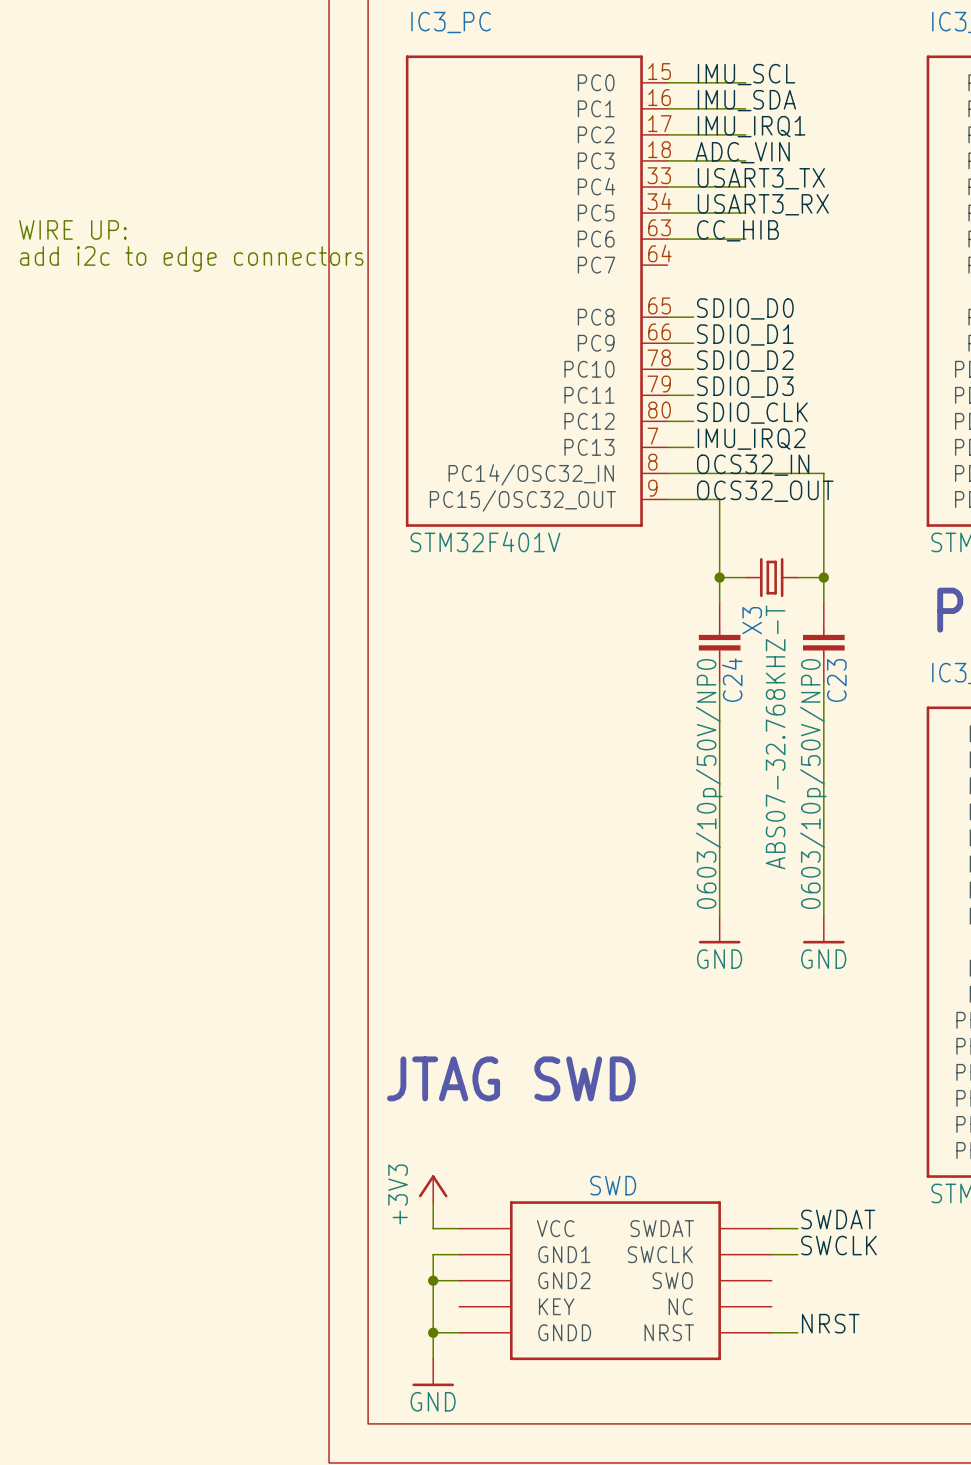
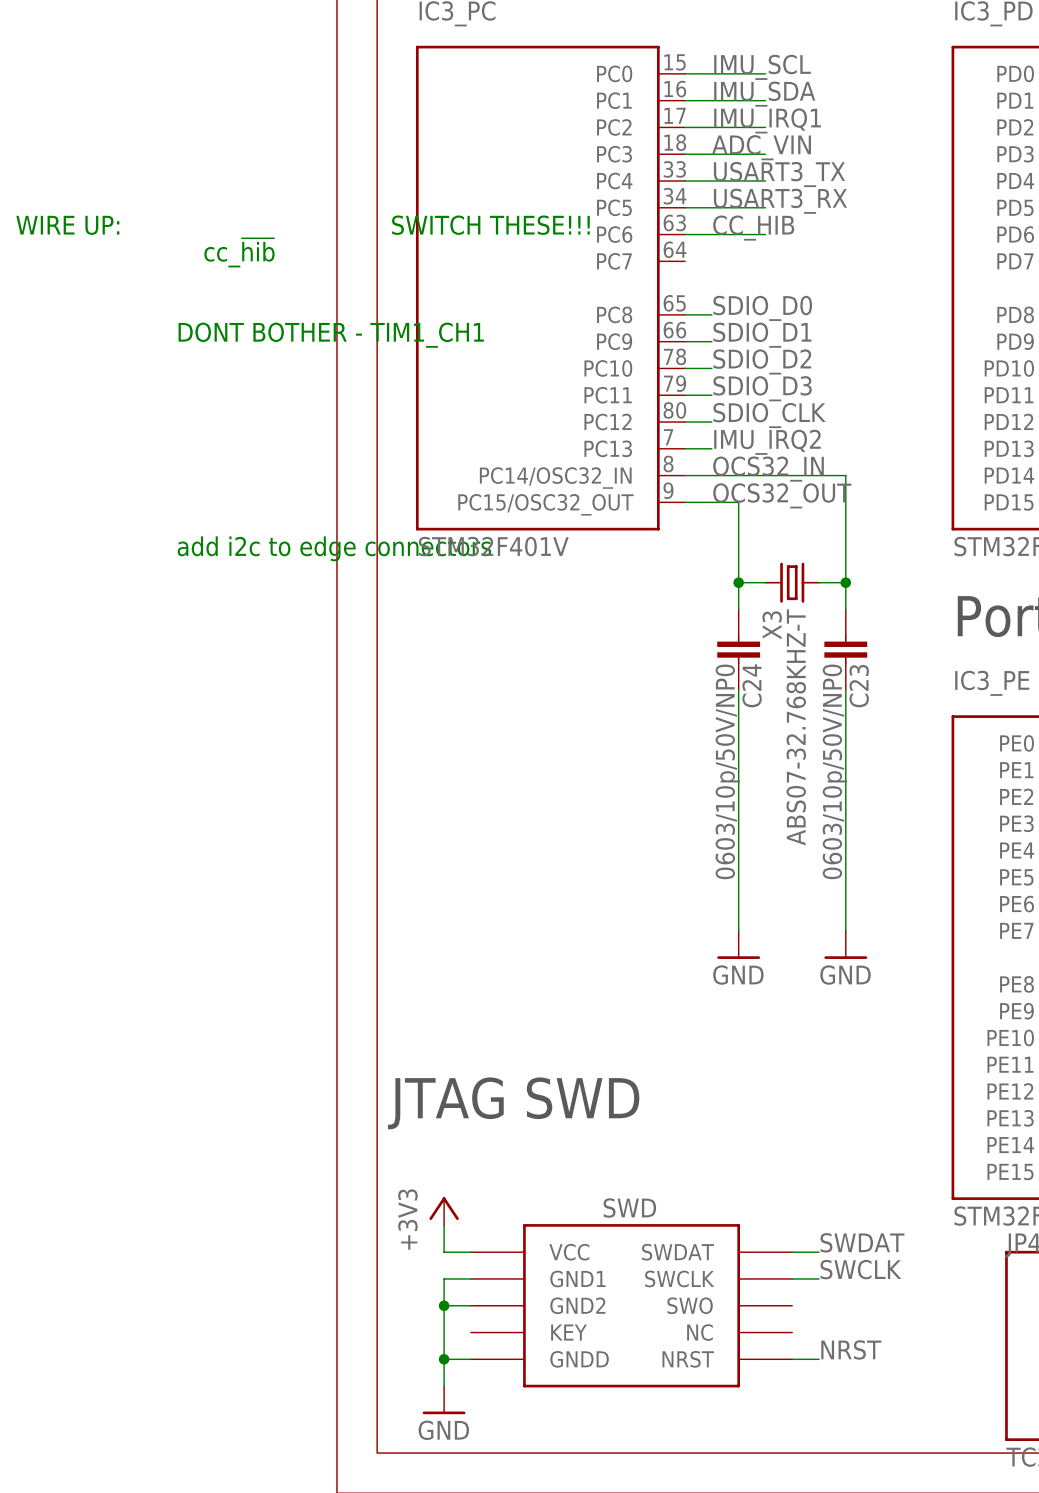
text: none -> SWITCH THESE!!! (490, 225)
text: none -> cc_~{hib} (239, 252)
text: add i2c to edge connectors (191, 259) -> none
text: none -> DONT BOTHER - TIM1_CH1 (331, 335)
text: none -> add i2c to edge connectors (334, 548)

